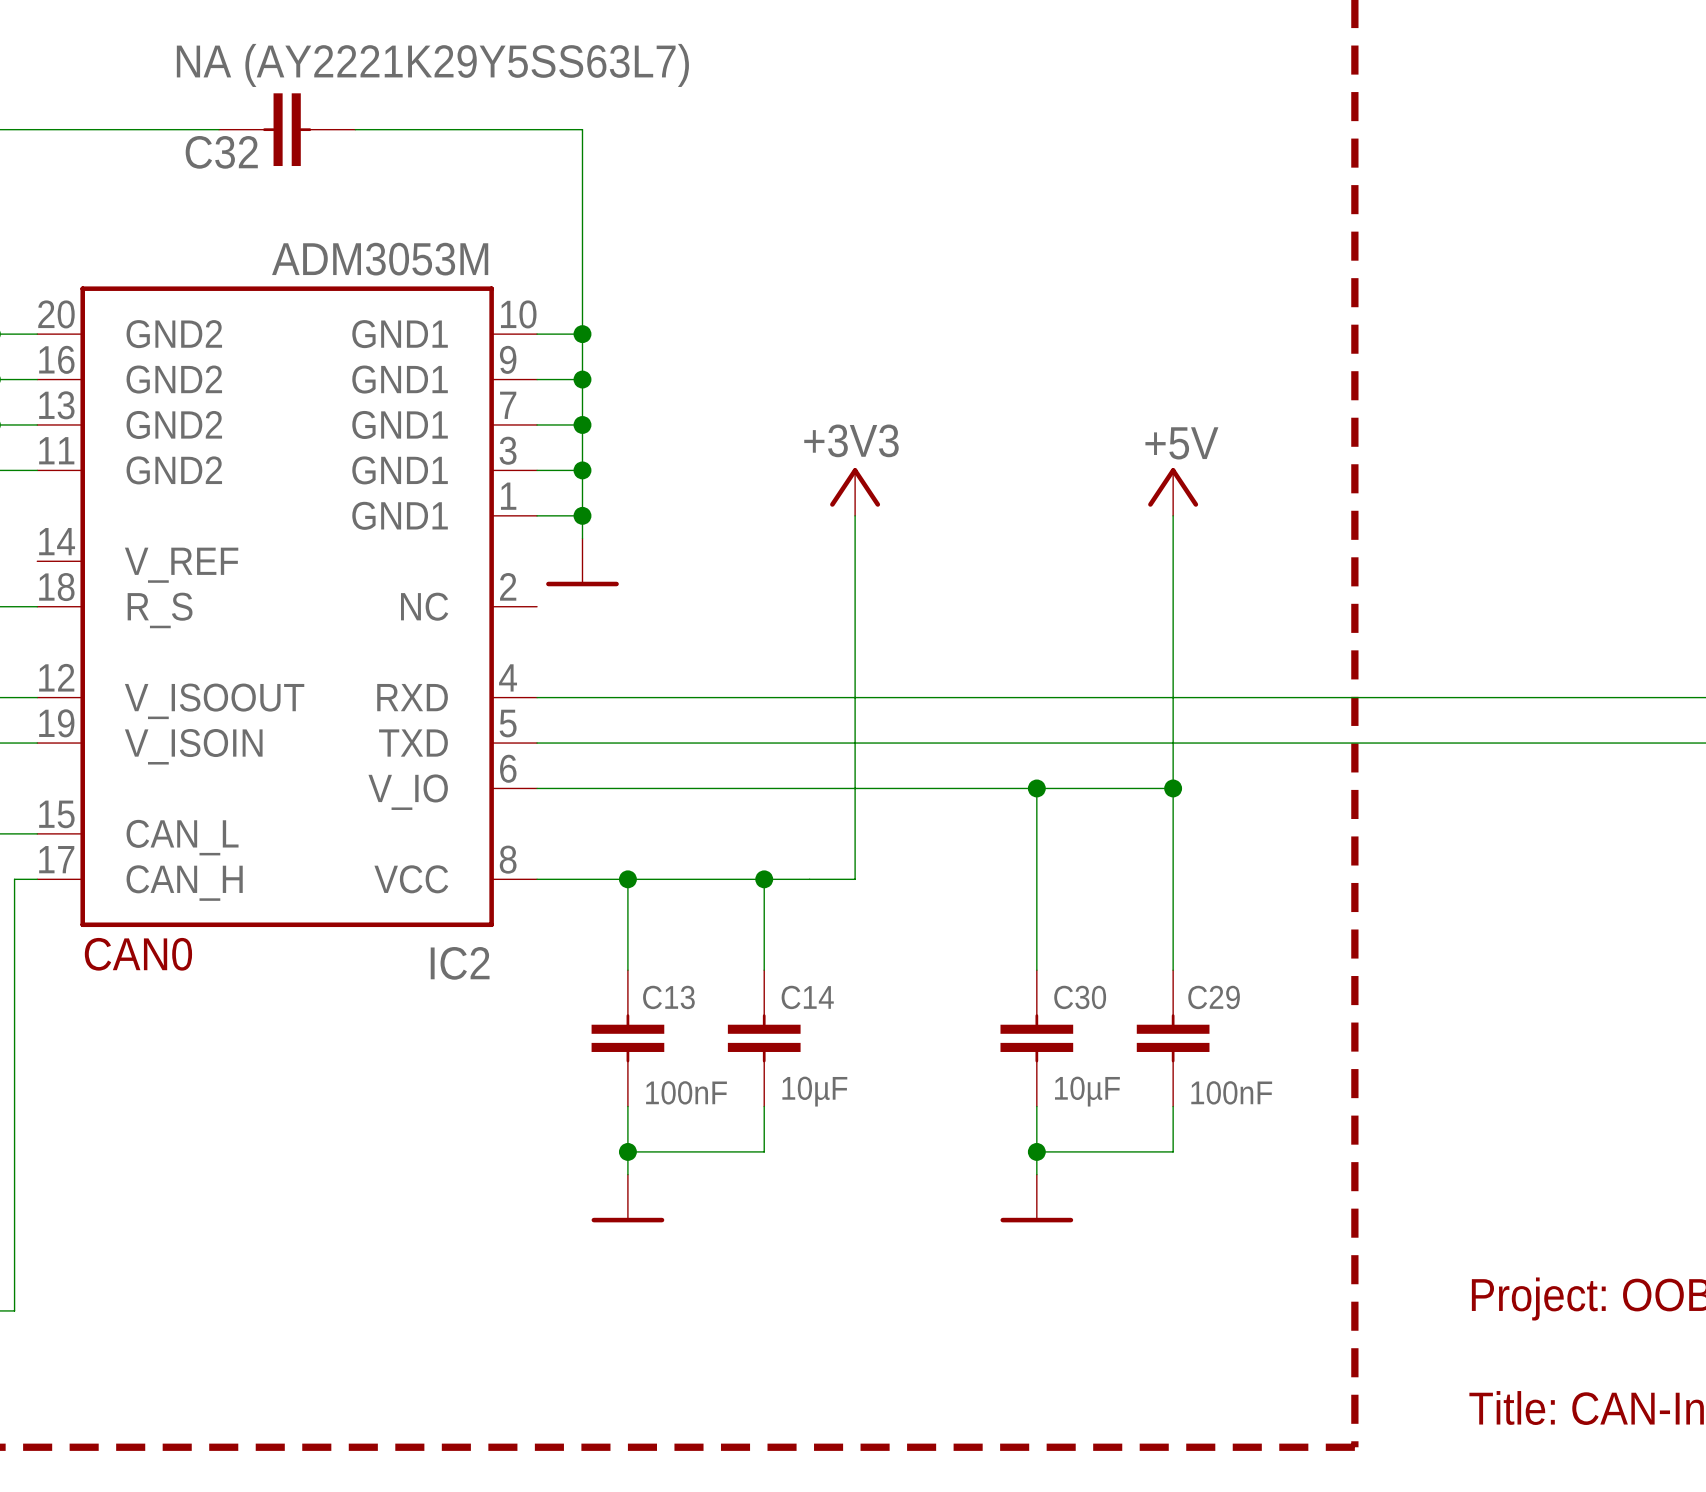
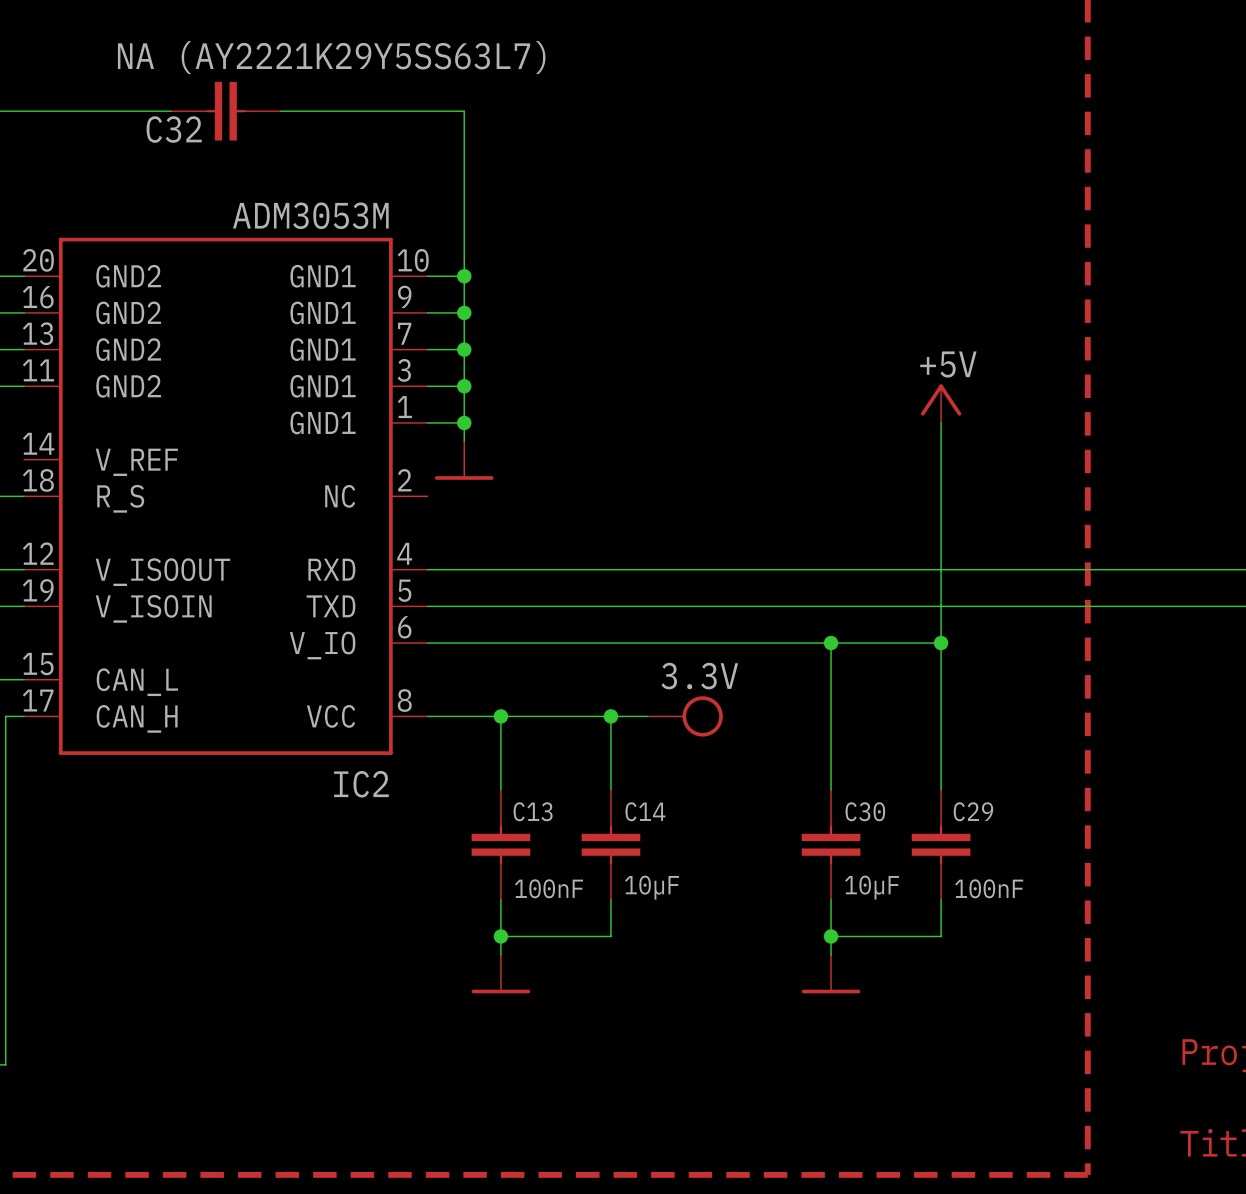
power symbol: +3V3 (855, 492) -> none
wire: (855, 515) (855, 879) (809, 879) -> none
power symbol: none -> 3.3V (685, 716)
text: CAN0 (138, 954) -> none

